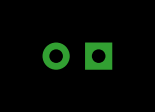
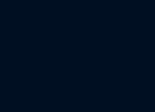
part: (77, 56) -> none

